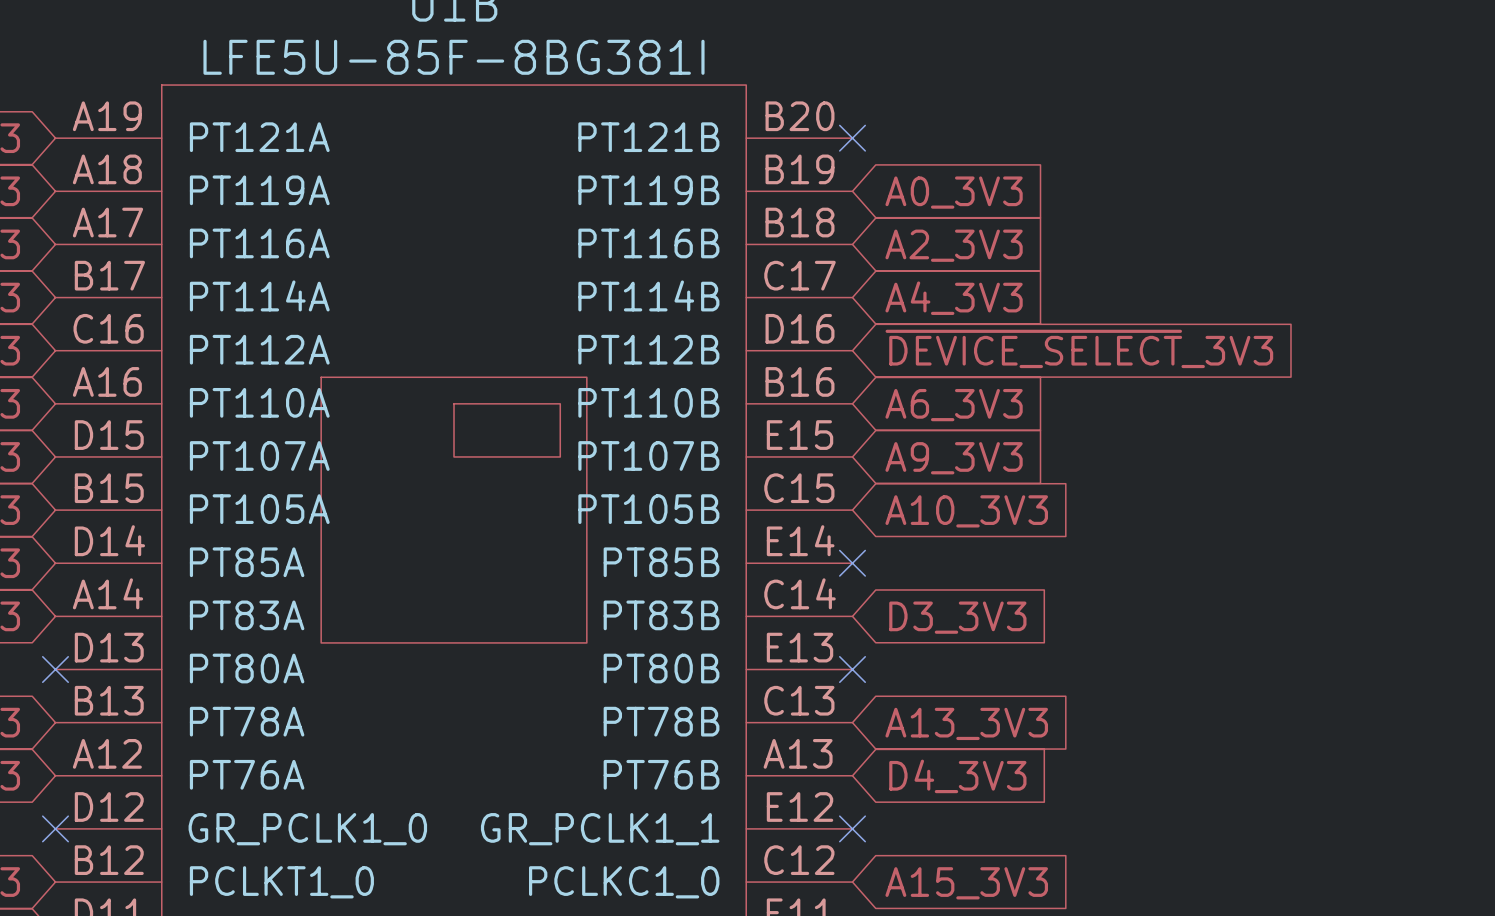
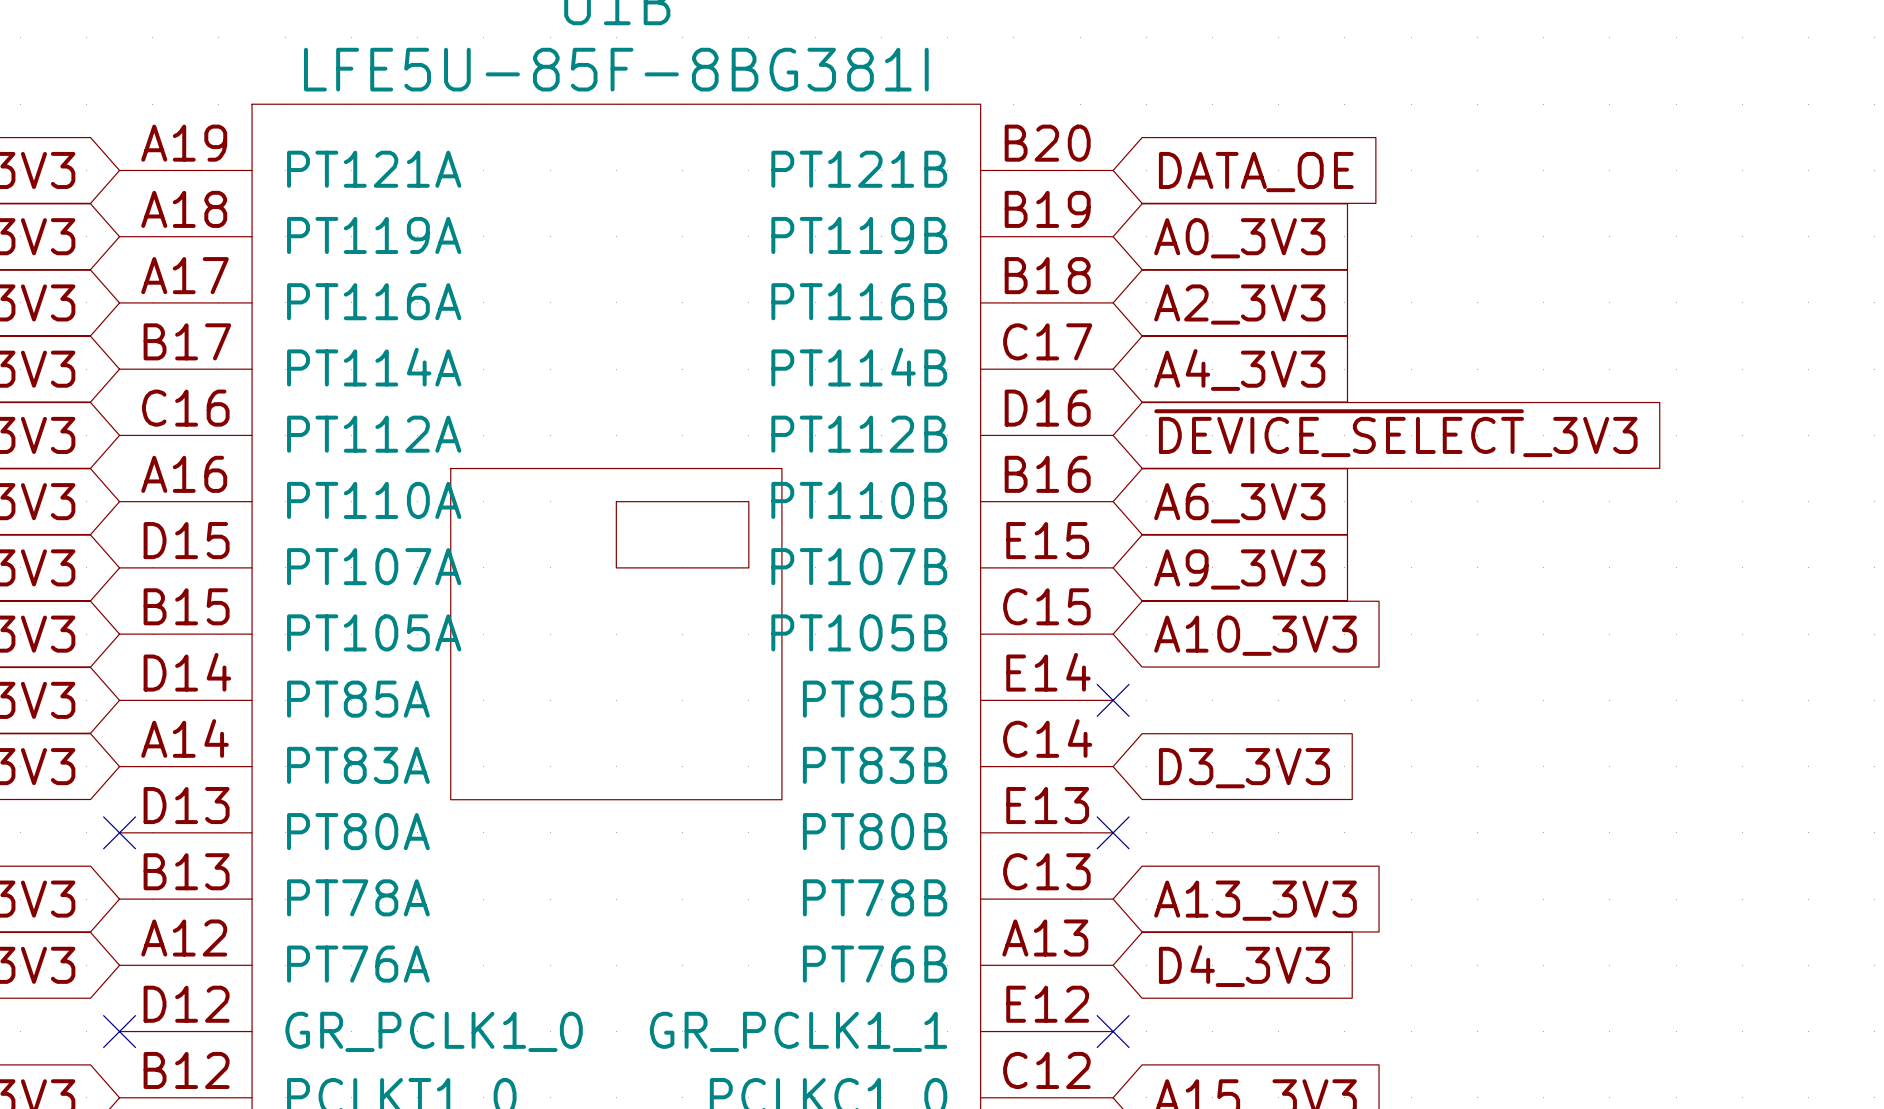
no-connect mark: (852, 138) -> none
global label: none -> DATA_OE (1256, 172)

